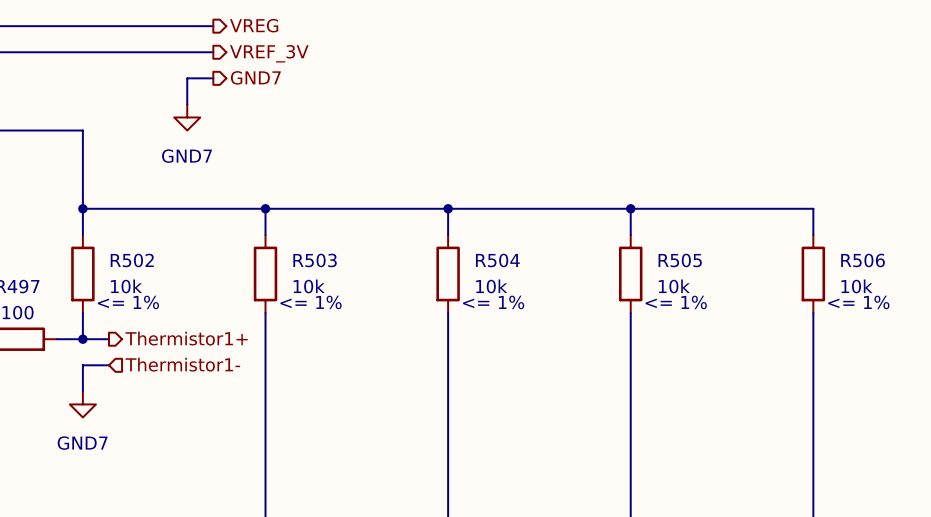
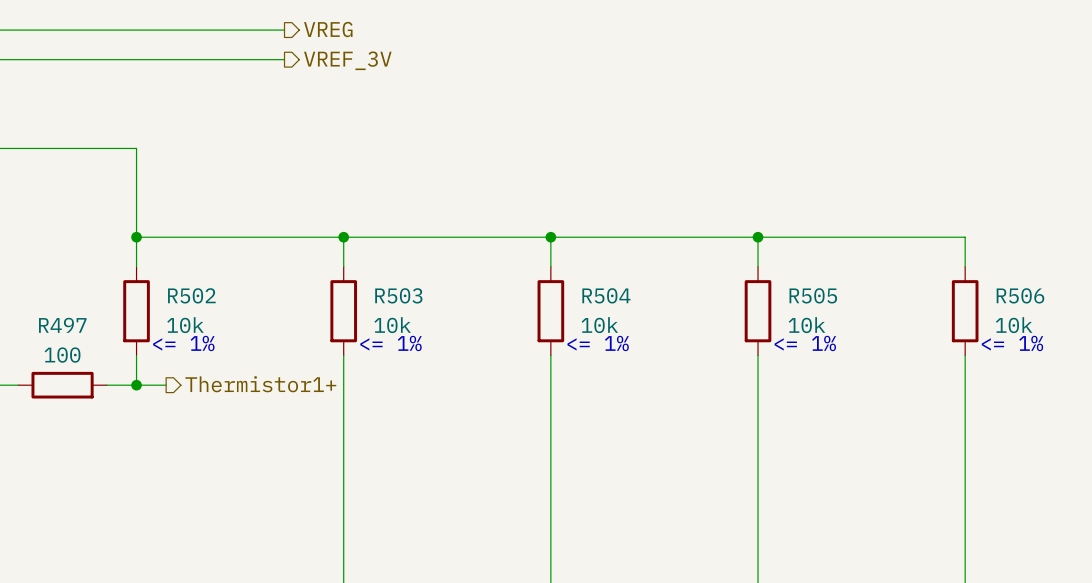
hierarchical label: GND7 (255, 77) -> none
wire: (213, 78) (187, 78) (187, 104) -> none
power symbol: GND7 (187, 117) -> none
hierarchical label: Thermistor1- (182, 364) -> none
wire: (108, 365) (82, 365) (82, 391) -> none
power symbol: GND7 (82, 404) -> none

